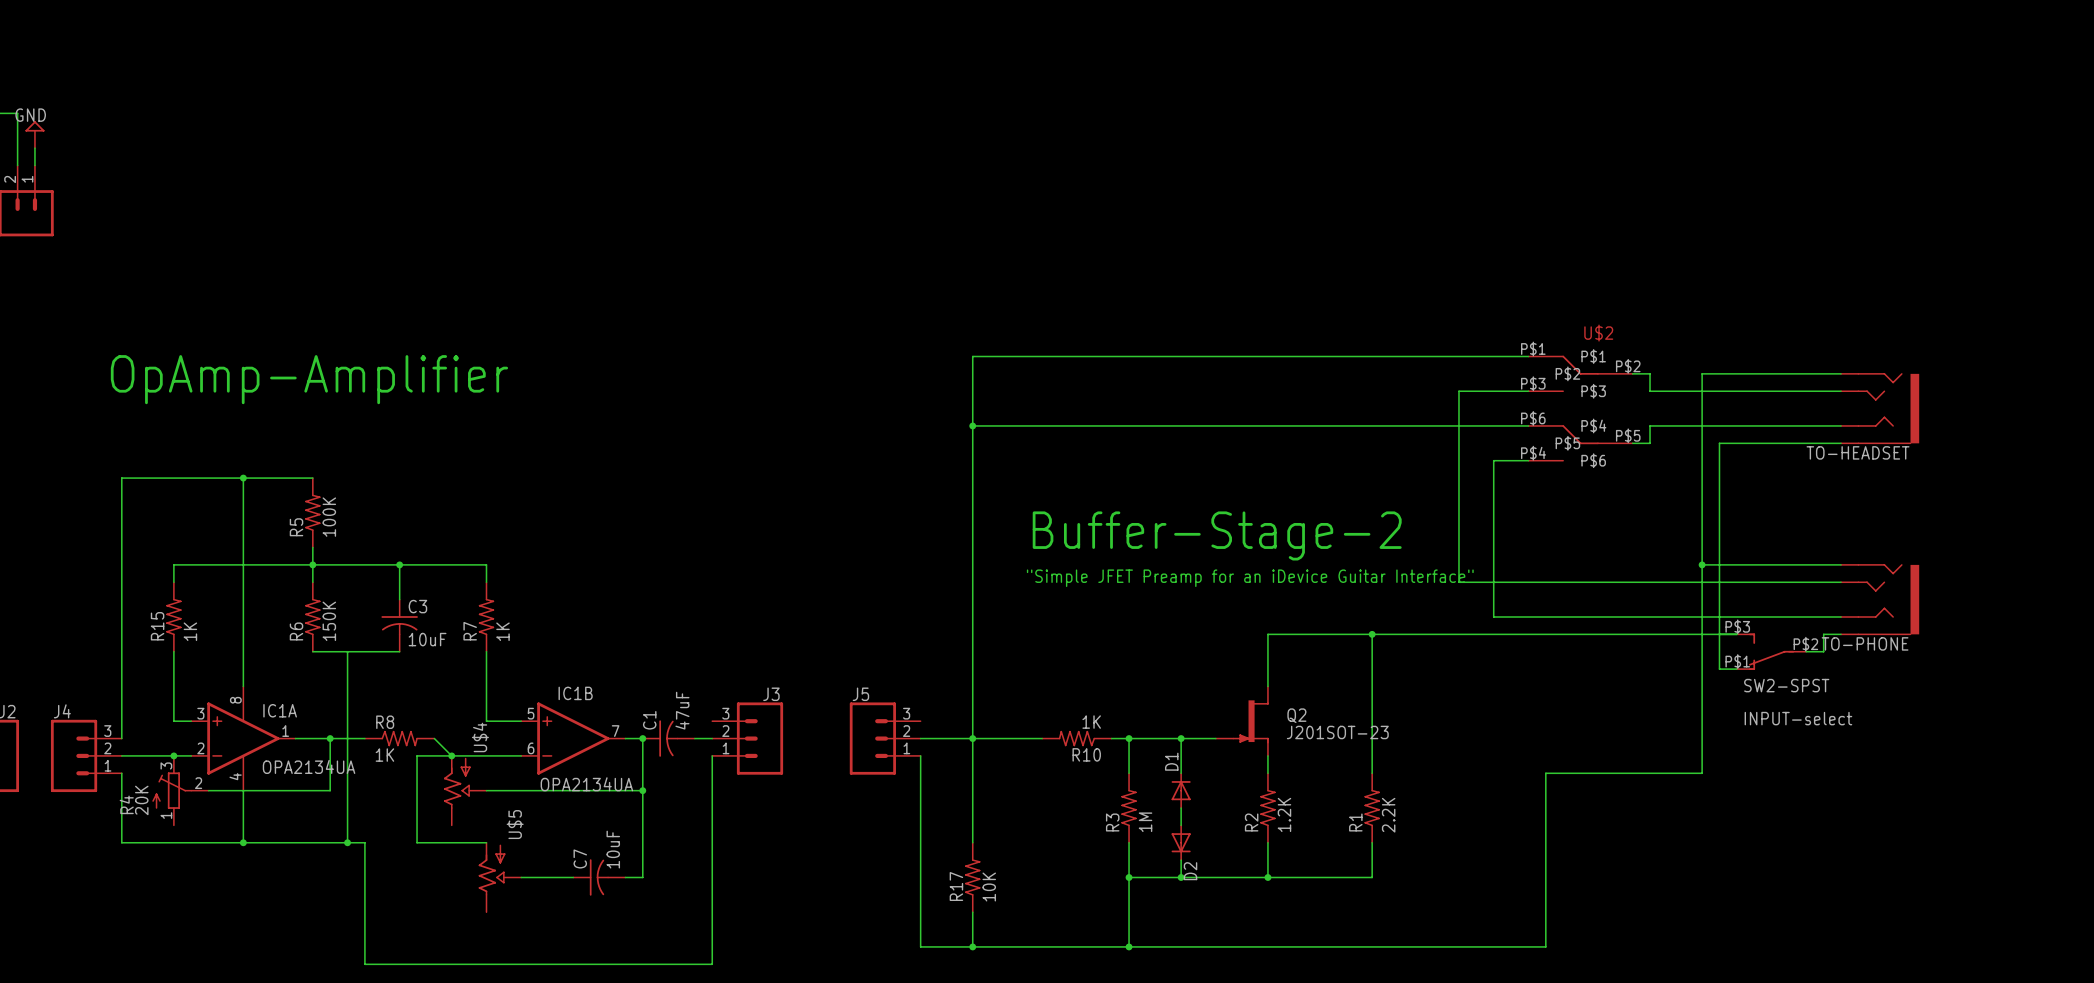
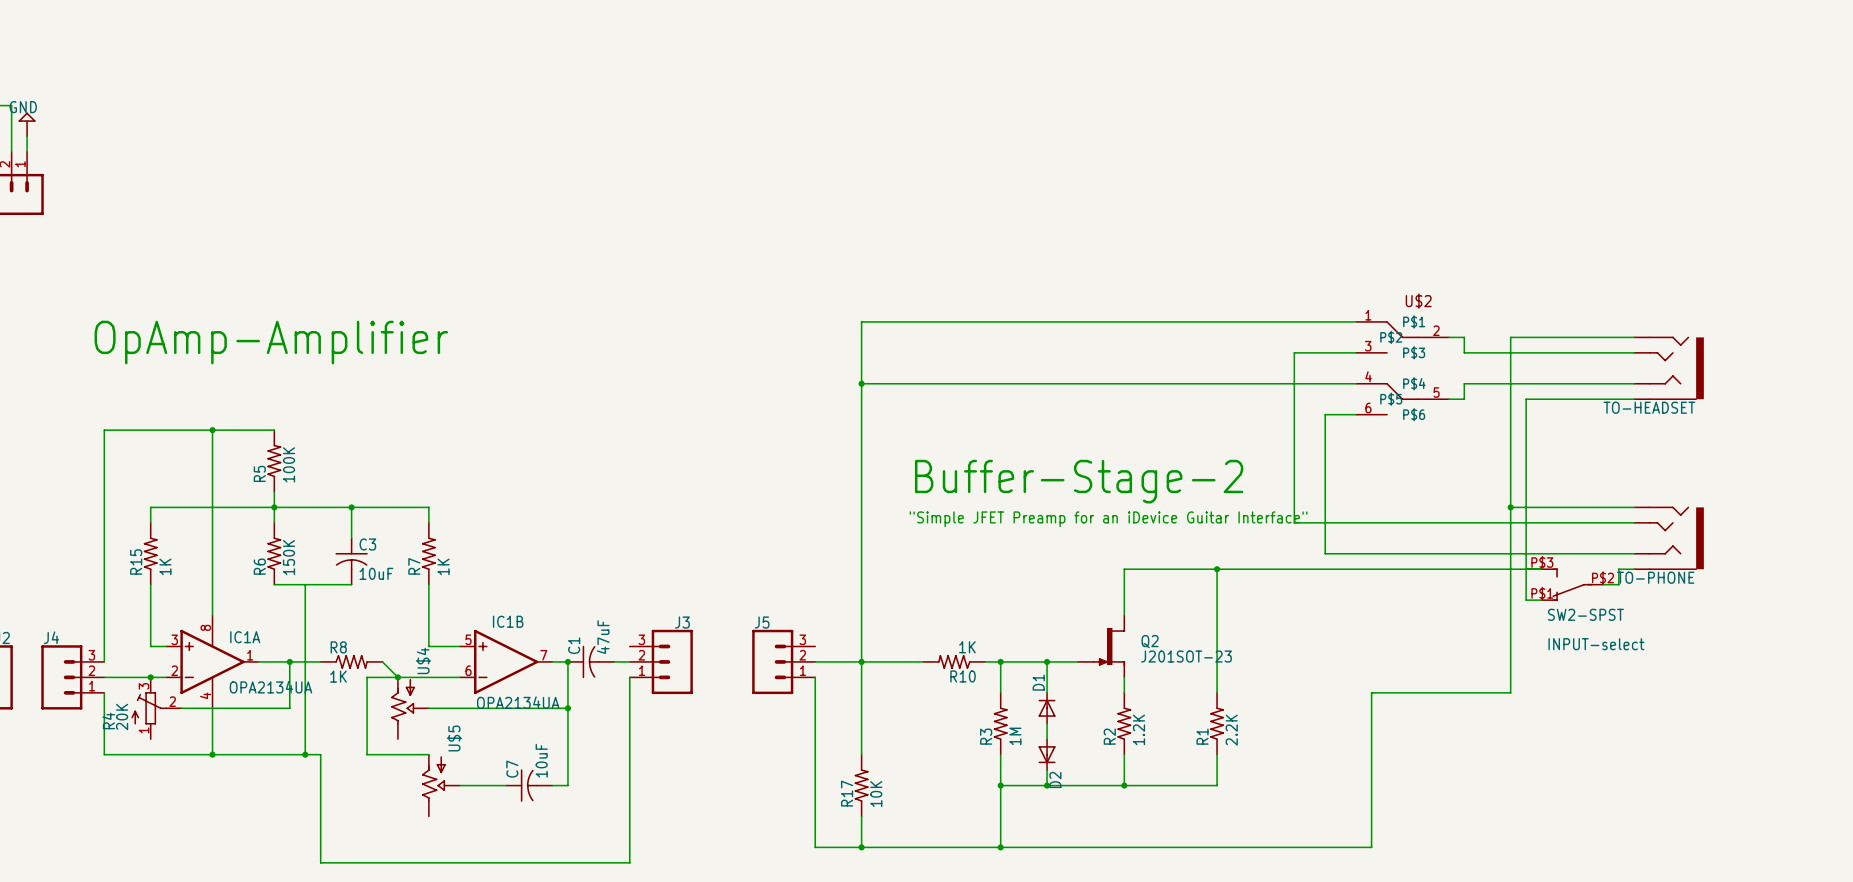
U$2 pin number: P$1 (1533, 348) -> 1 (1368, 315)
U$2 pin number: P$2 (1628, 366) -> 2 (1436, 330)
U$2 pin number: P$3 (1533, 383) -> 3 (1368, 346)
U$2 pin number: P$6 (1533, 418) -> 4 (1368, 376)
U$2 pin number: P$5 (1628, 435) -> 5 (1436, 392)
U$2 pin number: P$4 (1533, 453) -> 6 (1368, 407)

